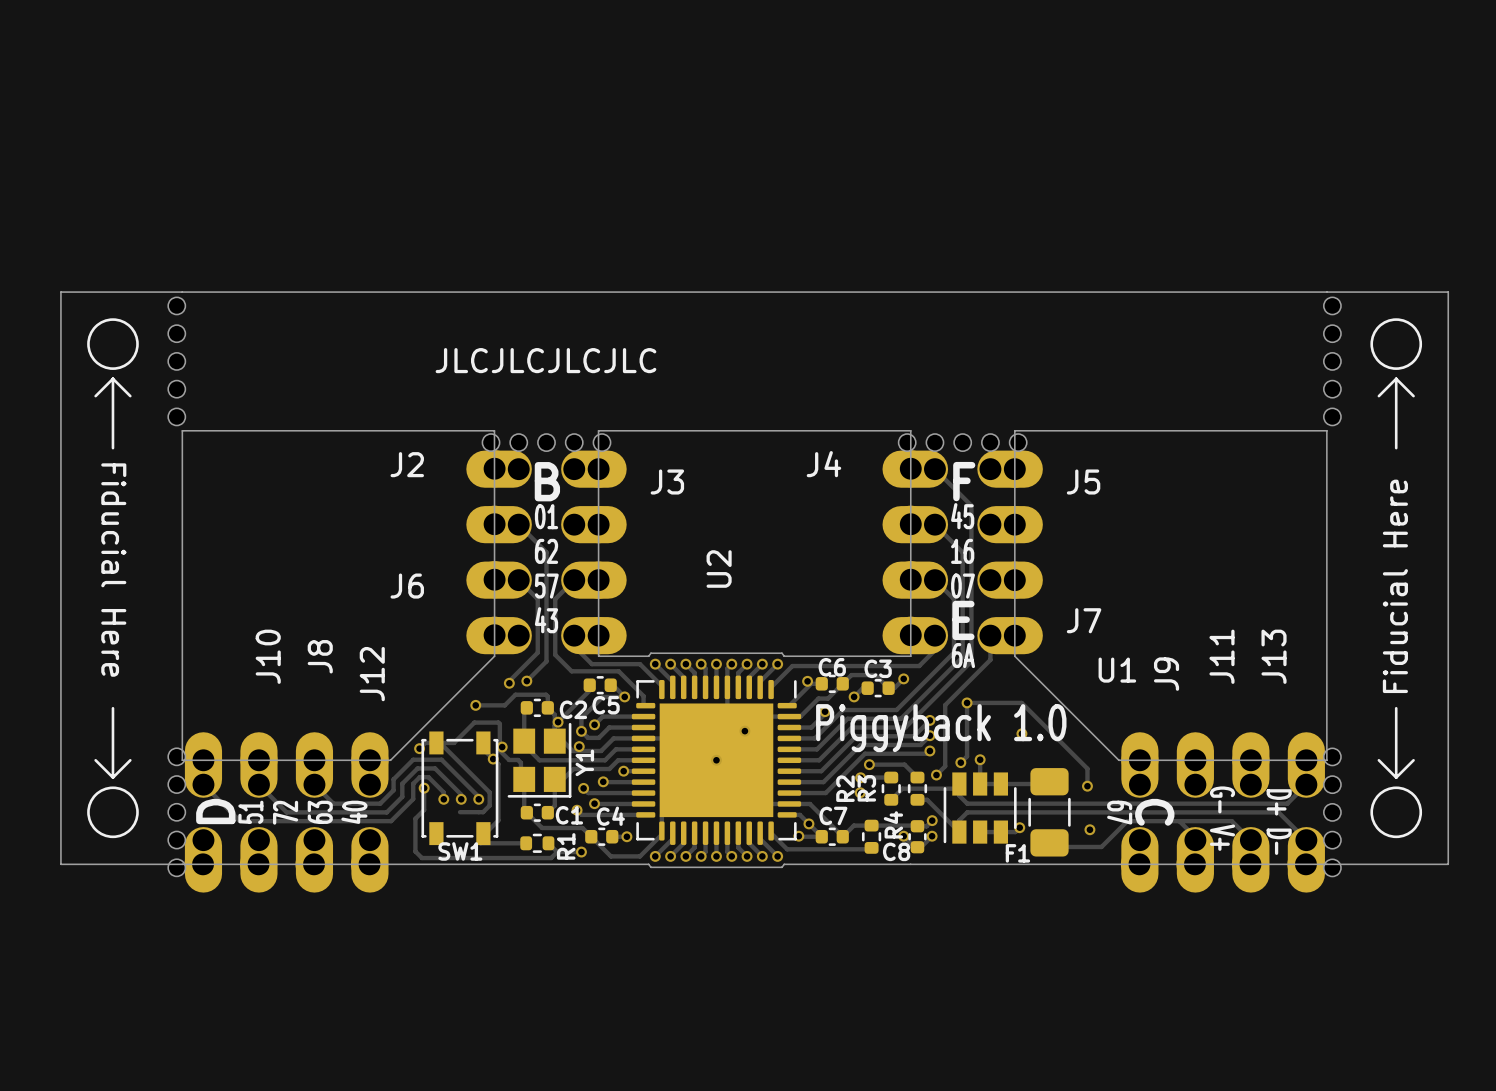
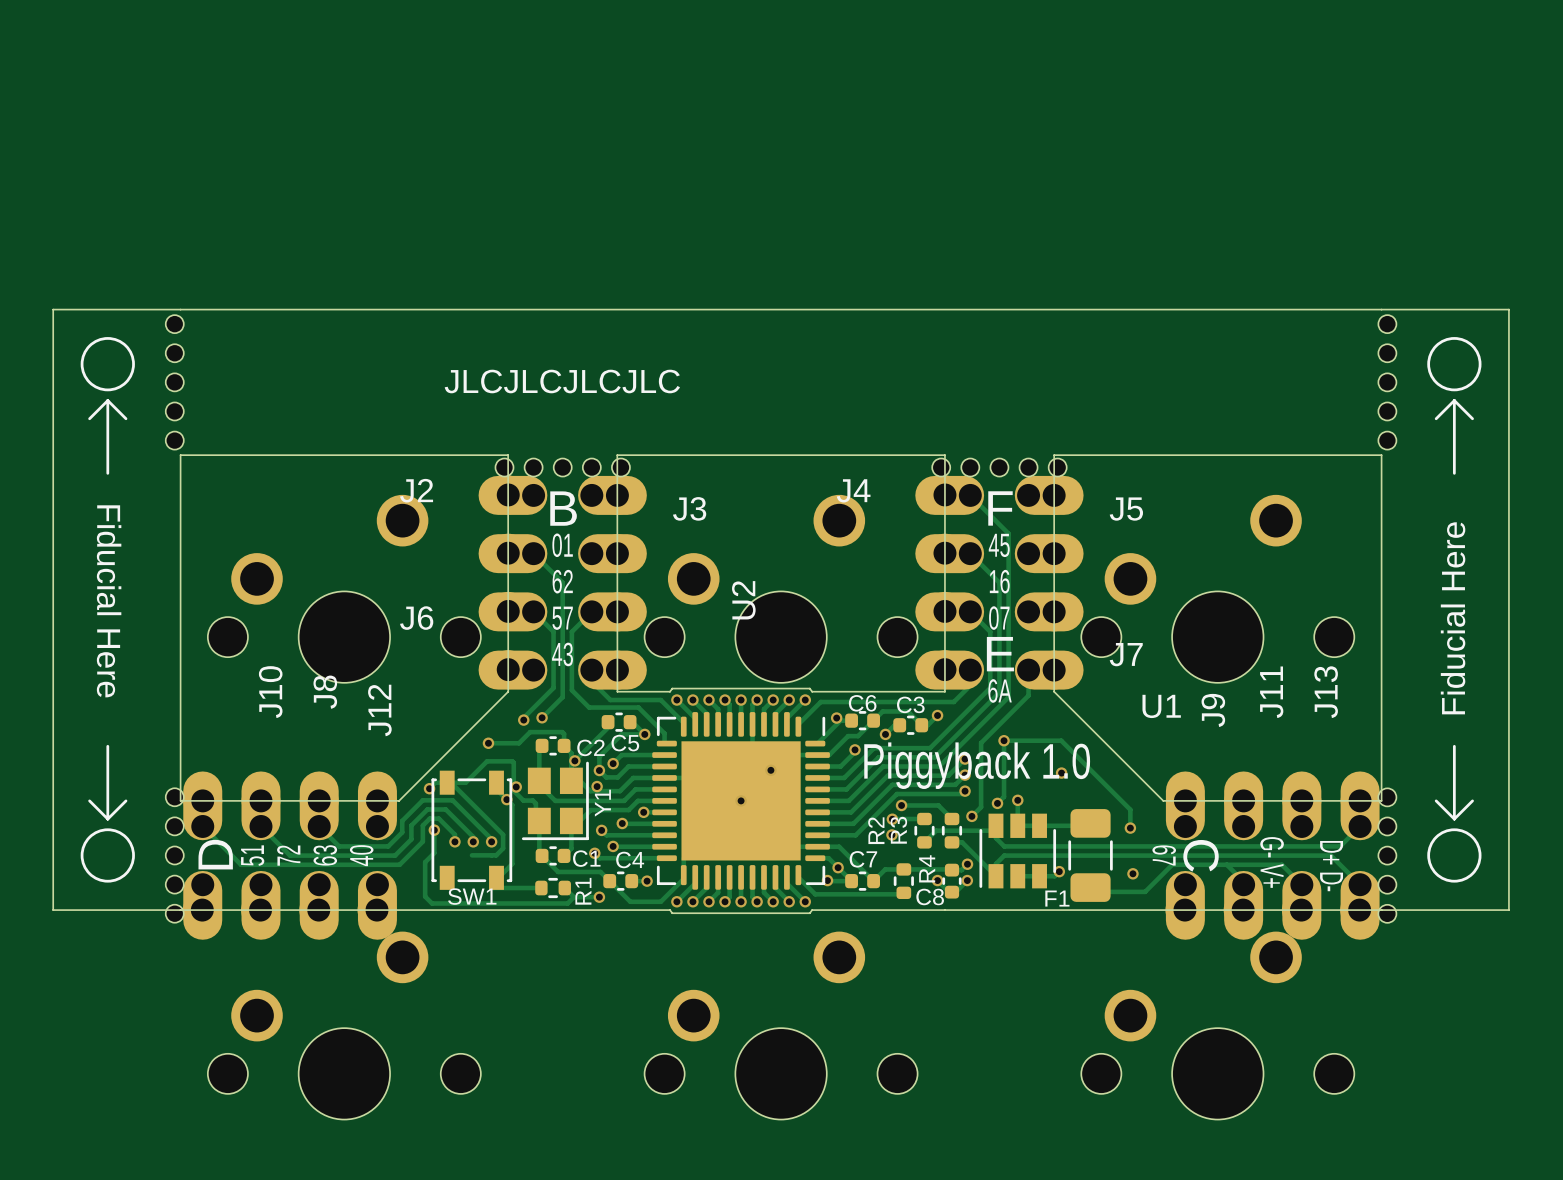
part: none -> (344, 588)
part: none -> (781, 588)
part: none -> (1217, 588)
part: none -> (344, 1025)
part: none -> (781, 1025)
part: none -> (1217, 1025)

